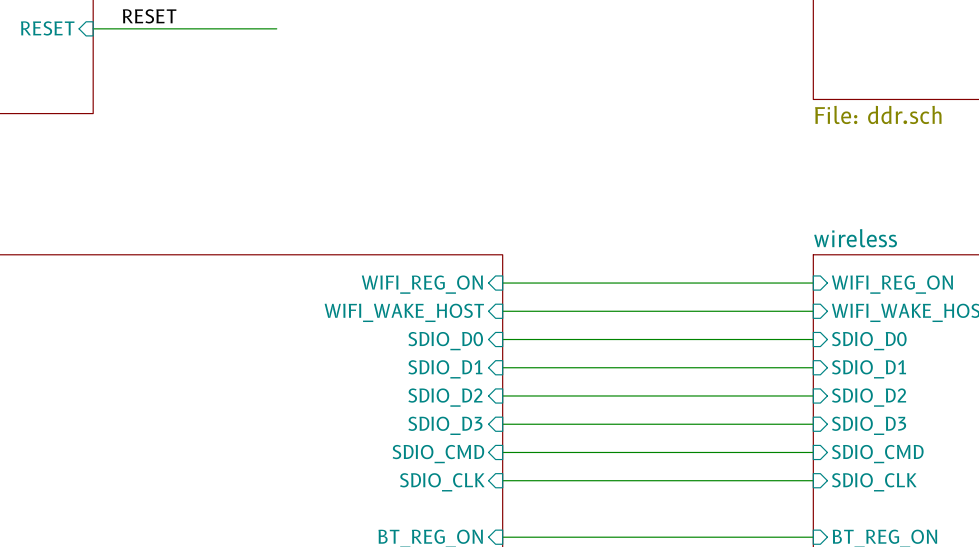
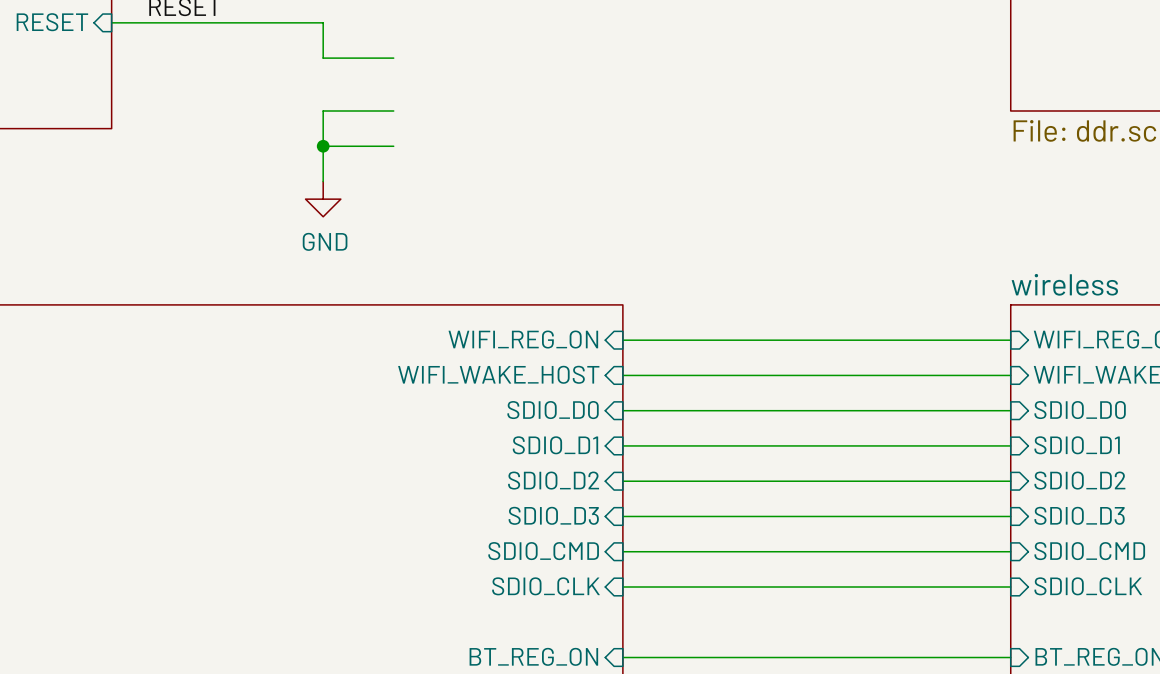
wire: (262, 28) (276, 28) -> (323, 22) (323, 58) (393, 58)
wire: none -> (393, 110) (323, 110) (323, 181)
wire: none -> (323, 146) (393, 146)
junction: none -> (323, 146)
power symbol: none -> GND (323, 199)

